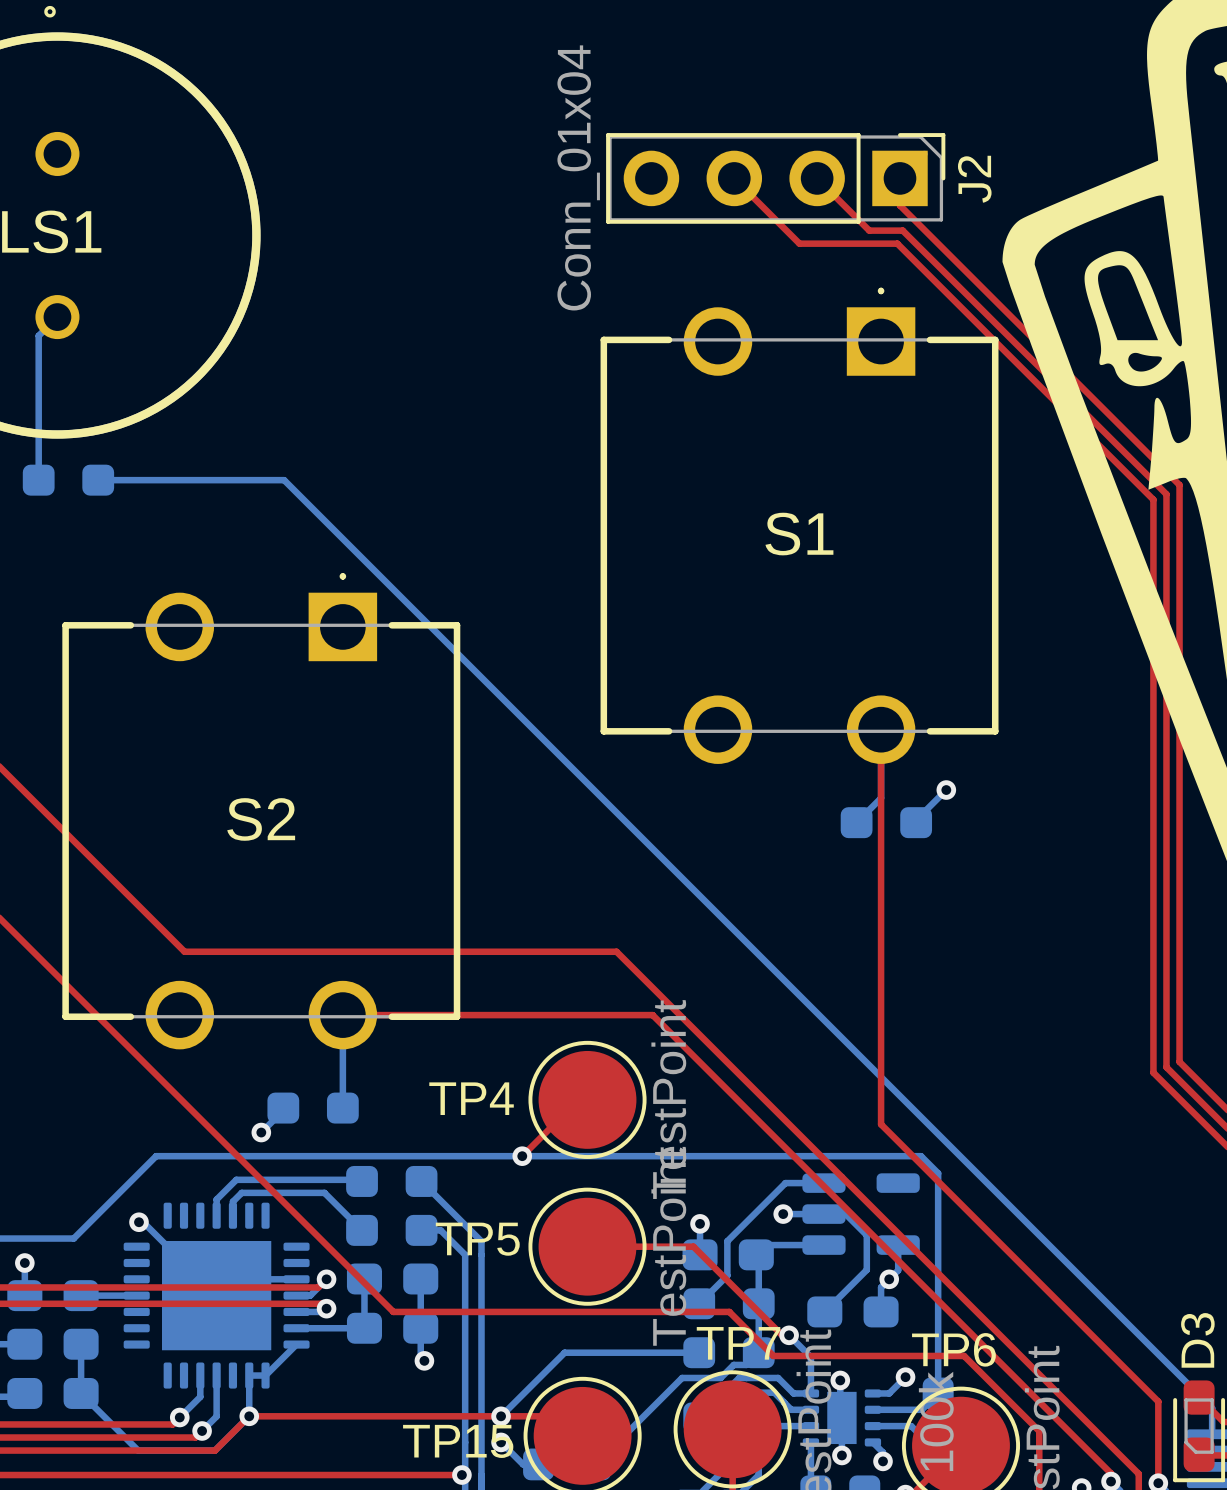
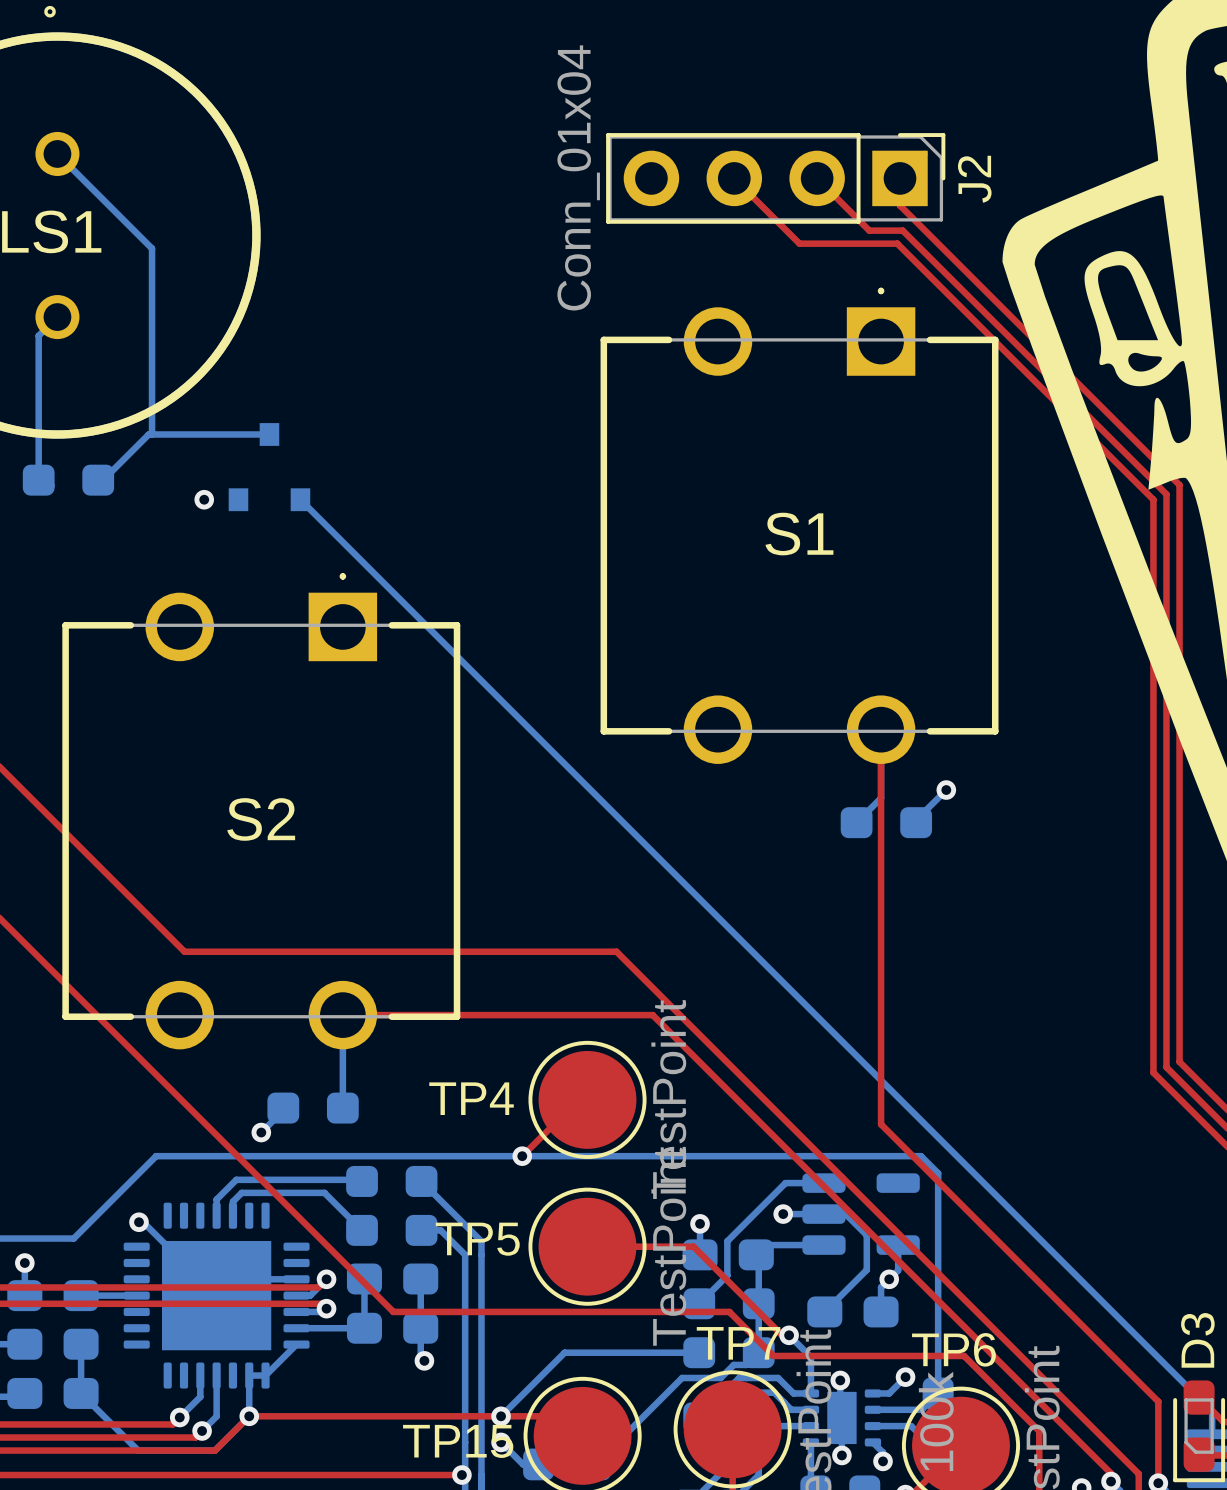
bottom track: none -> (57, 153) (152, 248) (152, 434)
bottom track: none -> (269, 434) (148, 434) (103, 480)
part: none -> (269, 467)
bottom track: (103, 480) (284, 480) (1212, 1408) (1212, 1411) -> (300, 496) (300, 499) (1212, 1411)
via: none -> (204, 499)

